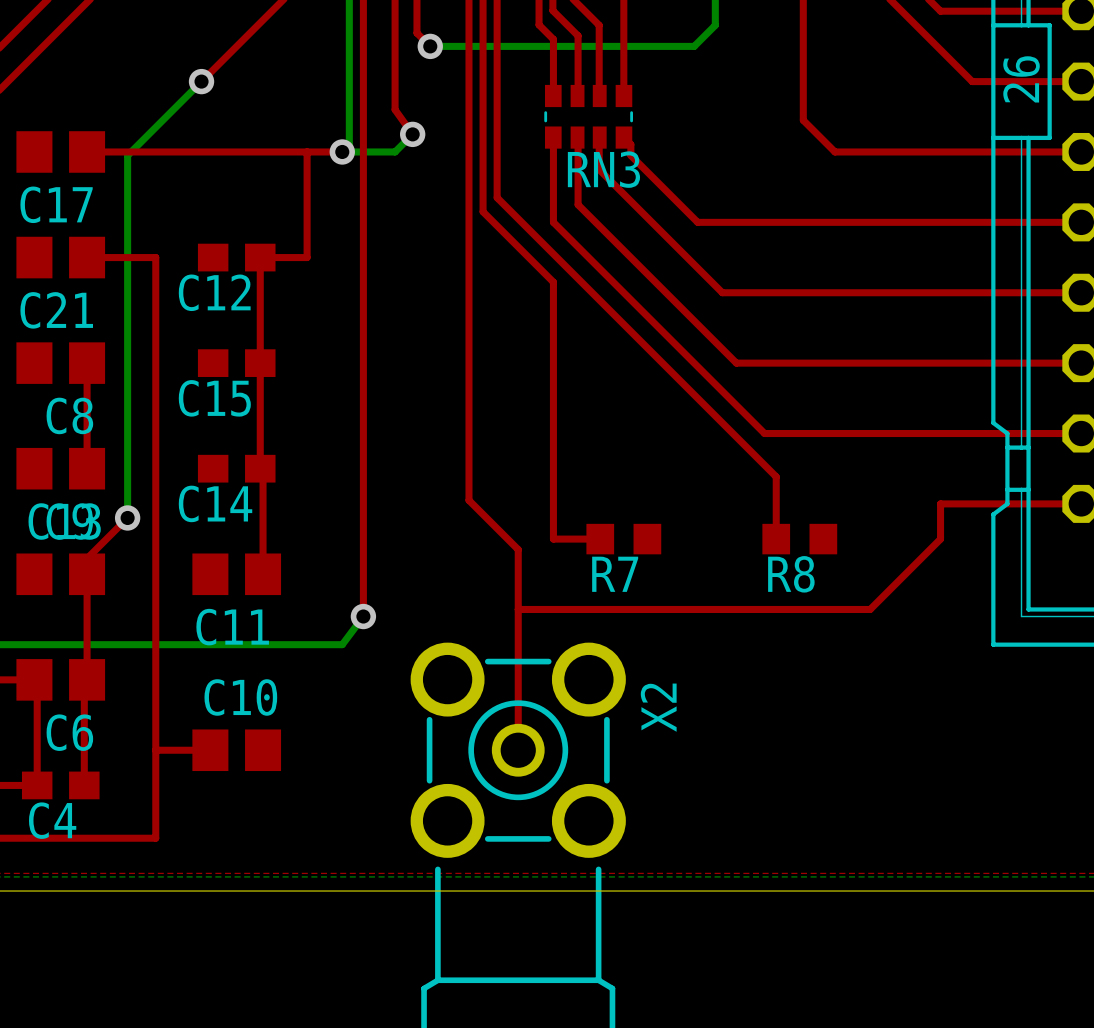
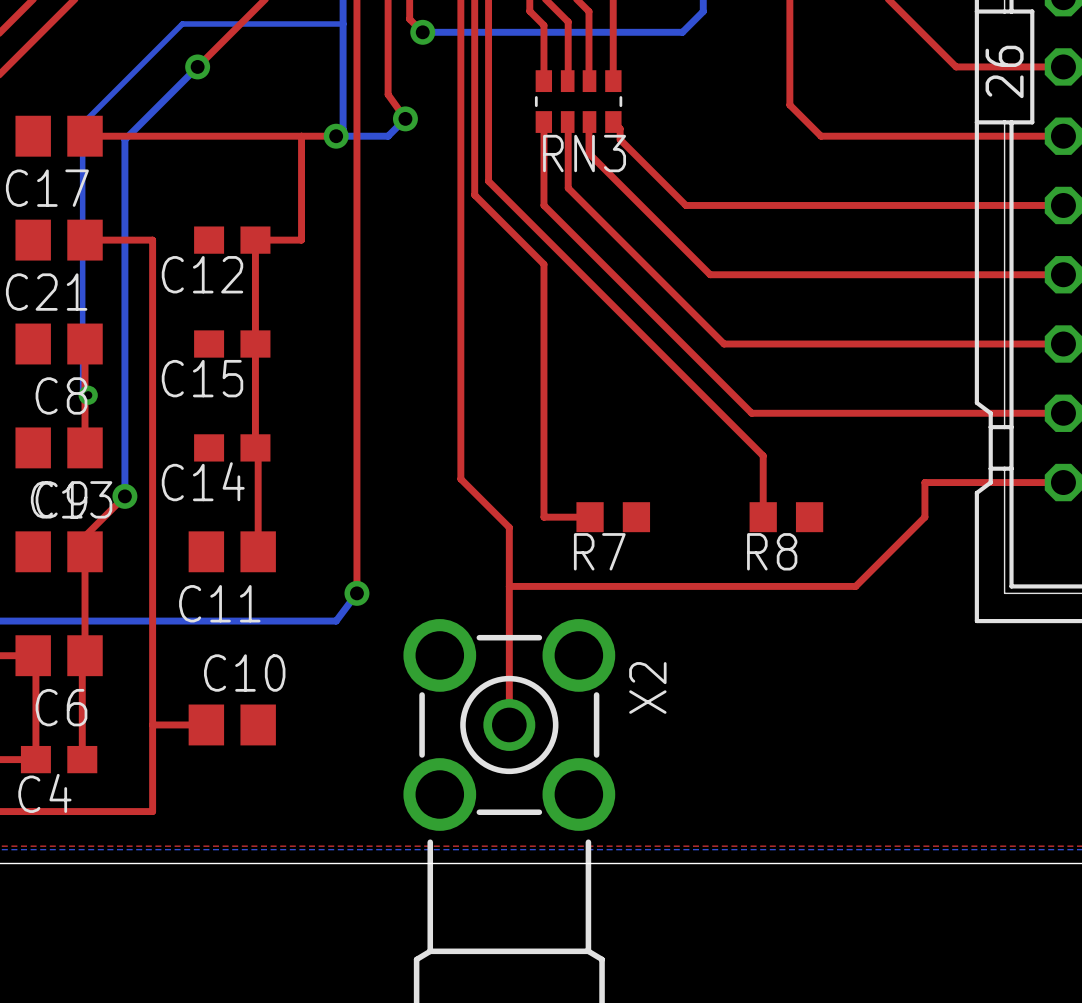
bottom track: none -> (343, 24) (182, 24) (82, 123) (82, 395) (88, 395)
via: none -> (88, 395)

